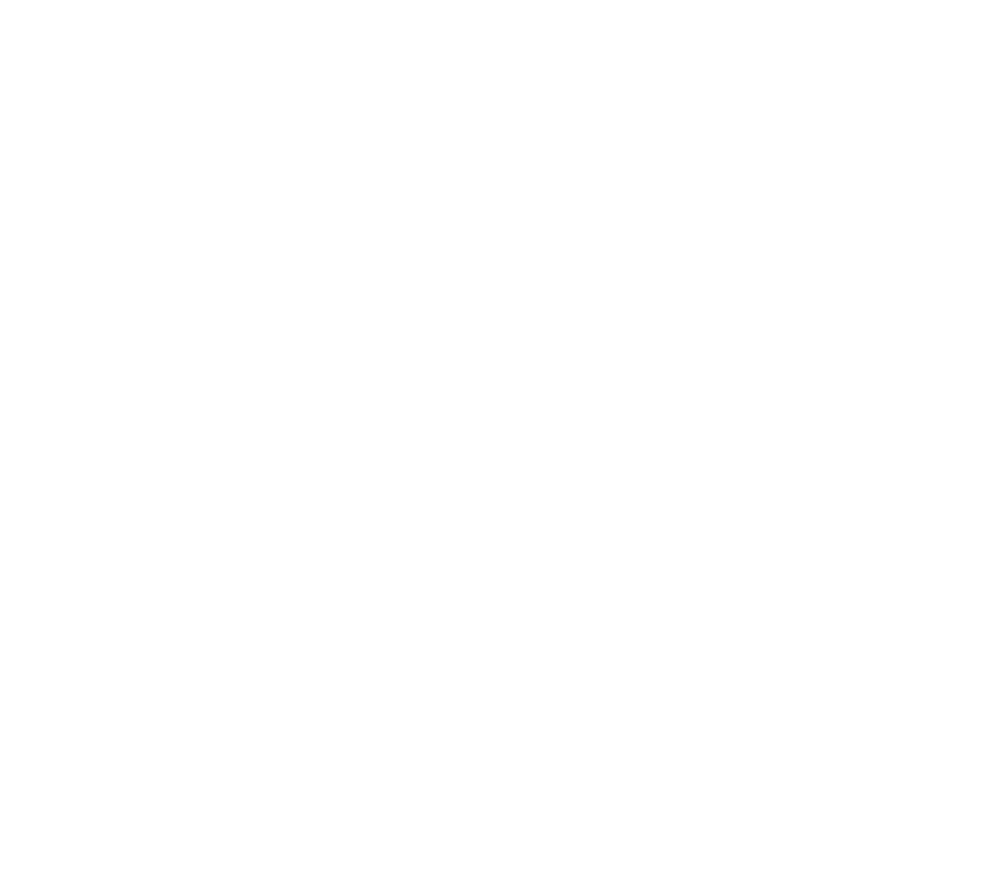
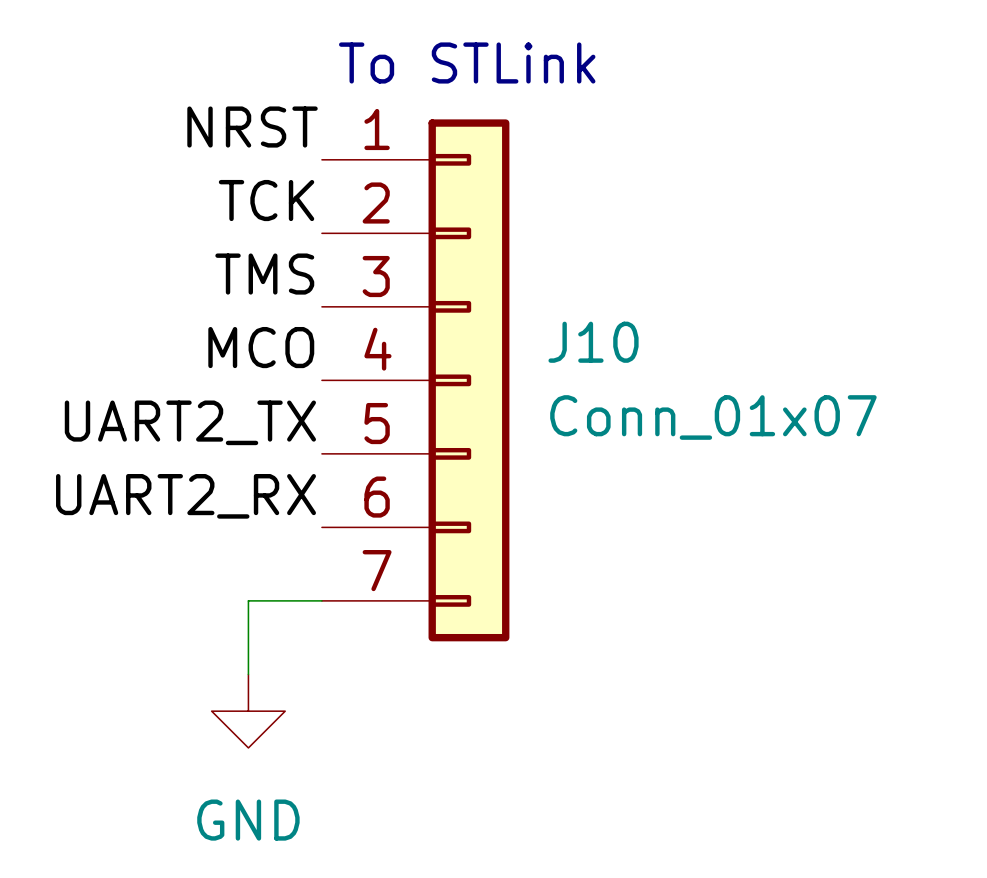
text: none -> To STLink (467, 62)
label: none -> NRST (252, 127)
label: none -> TCK (266, 200)
label: none -> TMS (264, 274)
label: none -> MCO (261, 347)
J10: none -> Conn_01x07 (415, 380)
label: none -> UART2_TX (190, 422)
label: none -> UART2_RX (186, 496)
wire: none -> (321, 600) (248, 600) (248, 674)
power symbol: none -> GND (248, 711)

